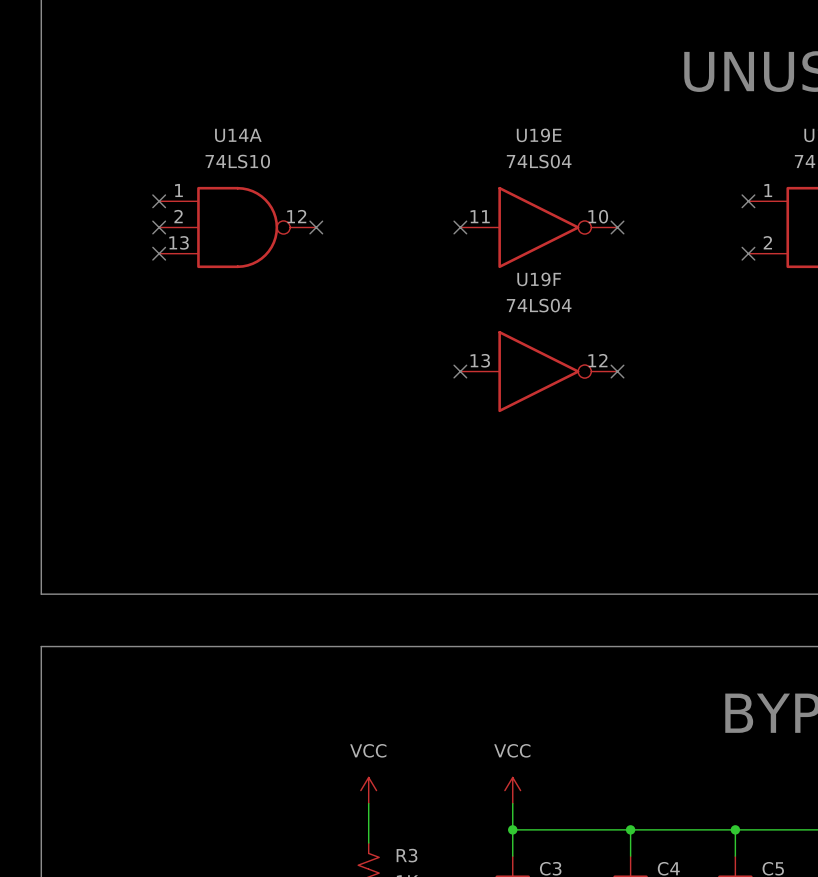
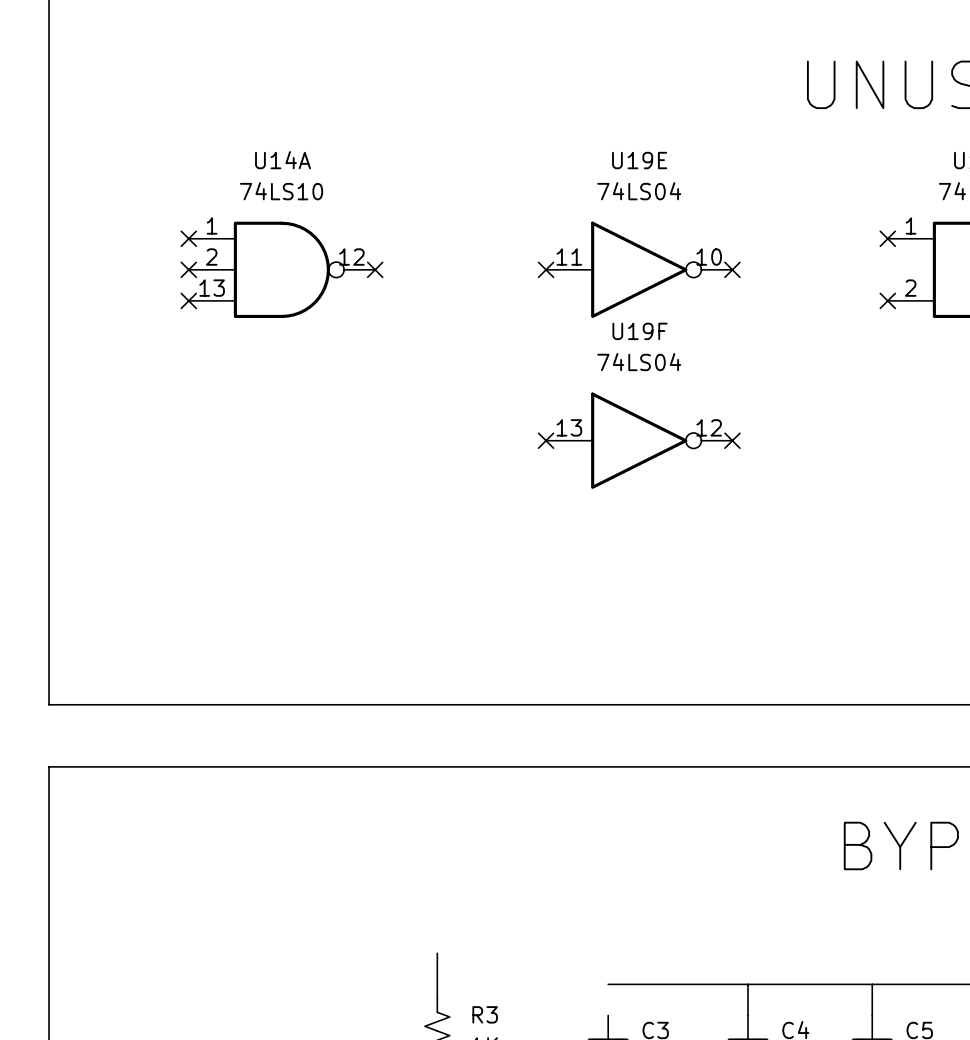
power symbol: VCC (368, 790) -> none
power symbol: VCC (512, 790) -> none
wire: (512, 803) (512, 856) -> none
junction: (512, 829) -> none
junction: (630, 829) -> none
junction: (735, 829) -> none

